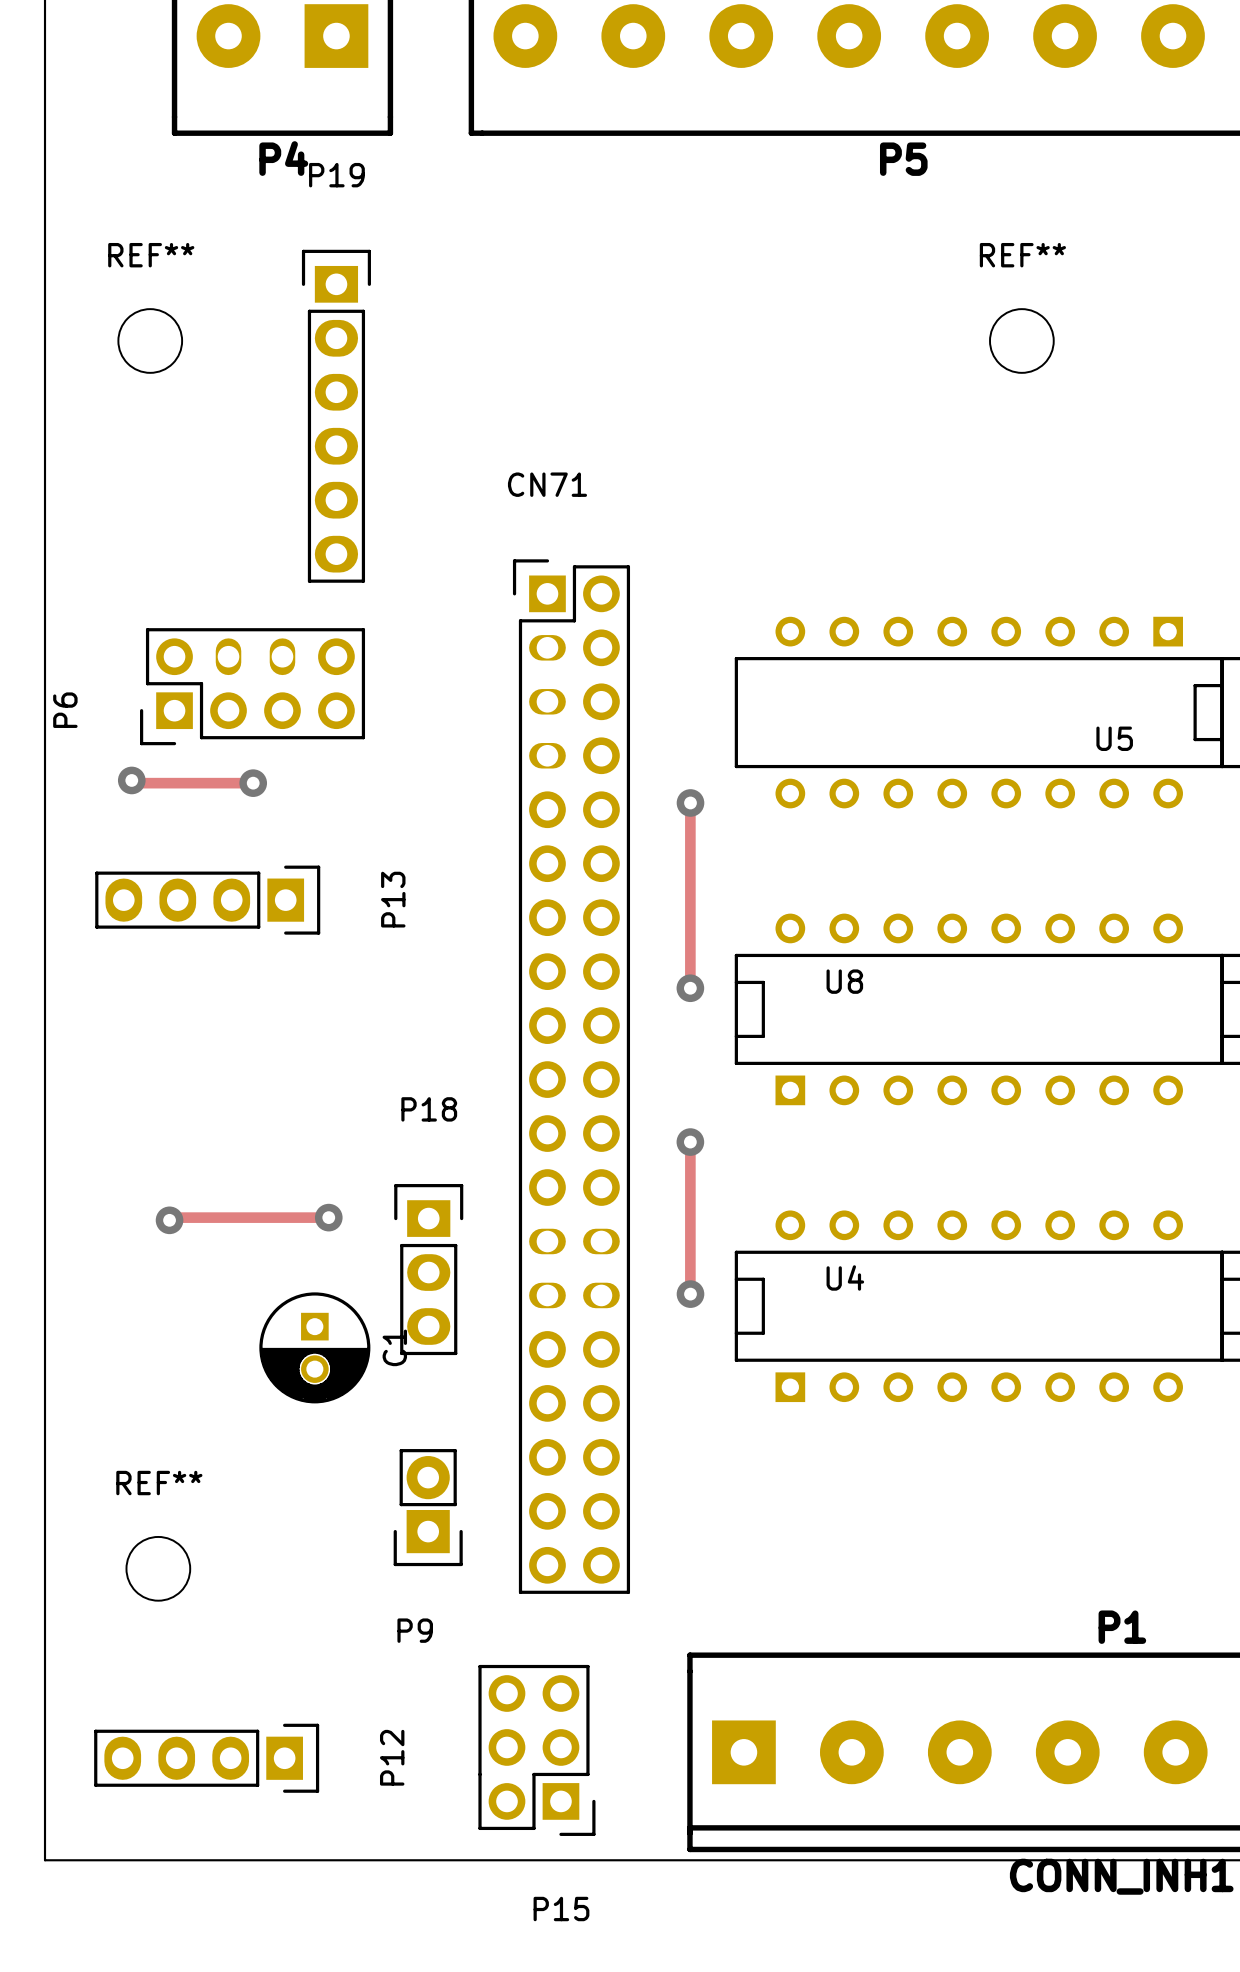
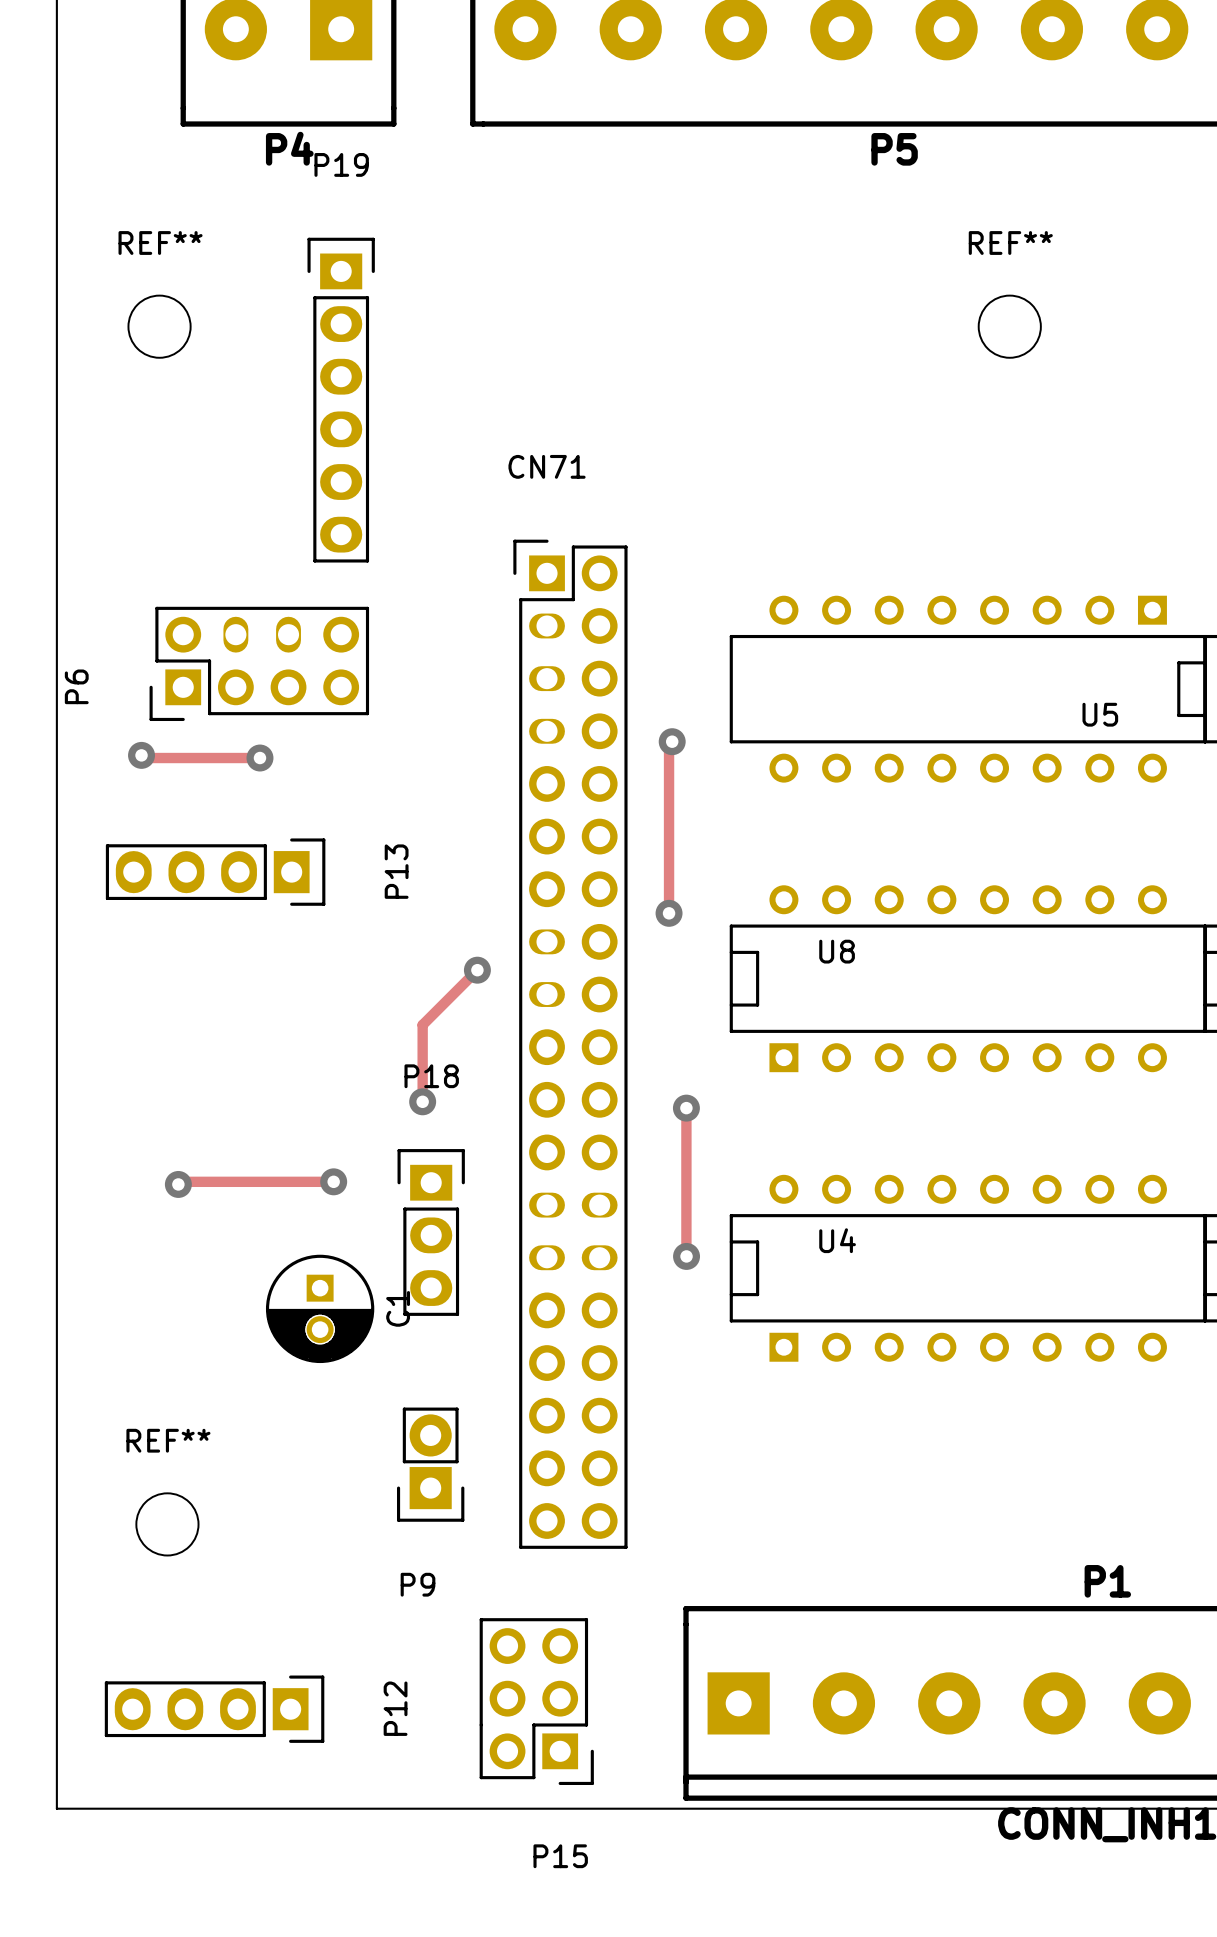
CN71 footprint: [512, 559, 631, 1594] -> [513, 539, 628, 1549]
track: none -> (672, 741) (669, 744) (669, 913)
via position: (690, 802) -> (672, 741)
track: (690, 803) (690, 988) -> none
via position: (690, 988) -> (669, 913)
track: none -> (477, 970) (422, 1024) (422, 1101)
via: none -> (477, 970)
via: none -> (422, 1101)

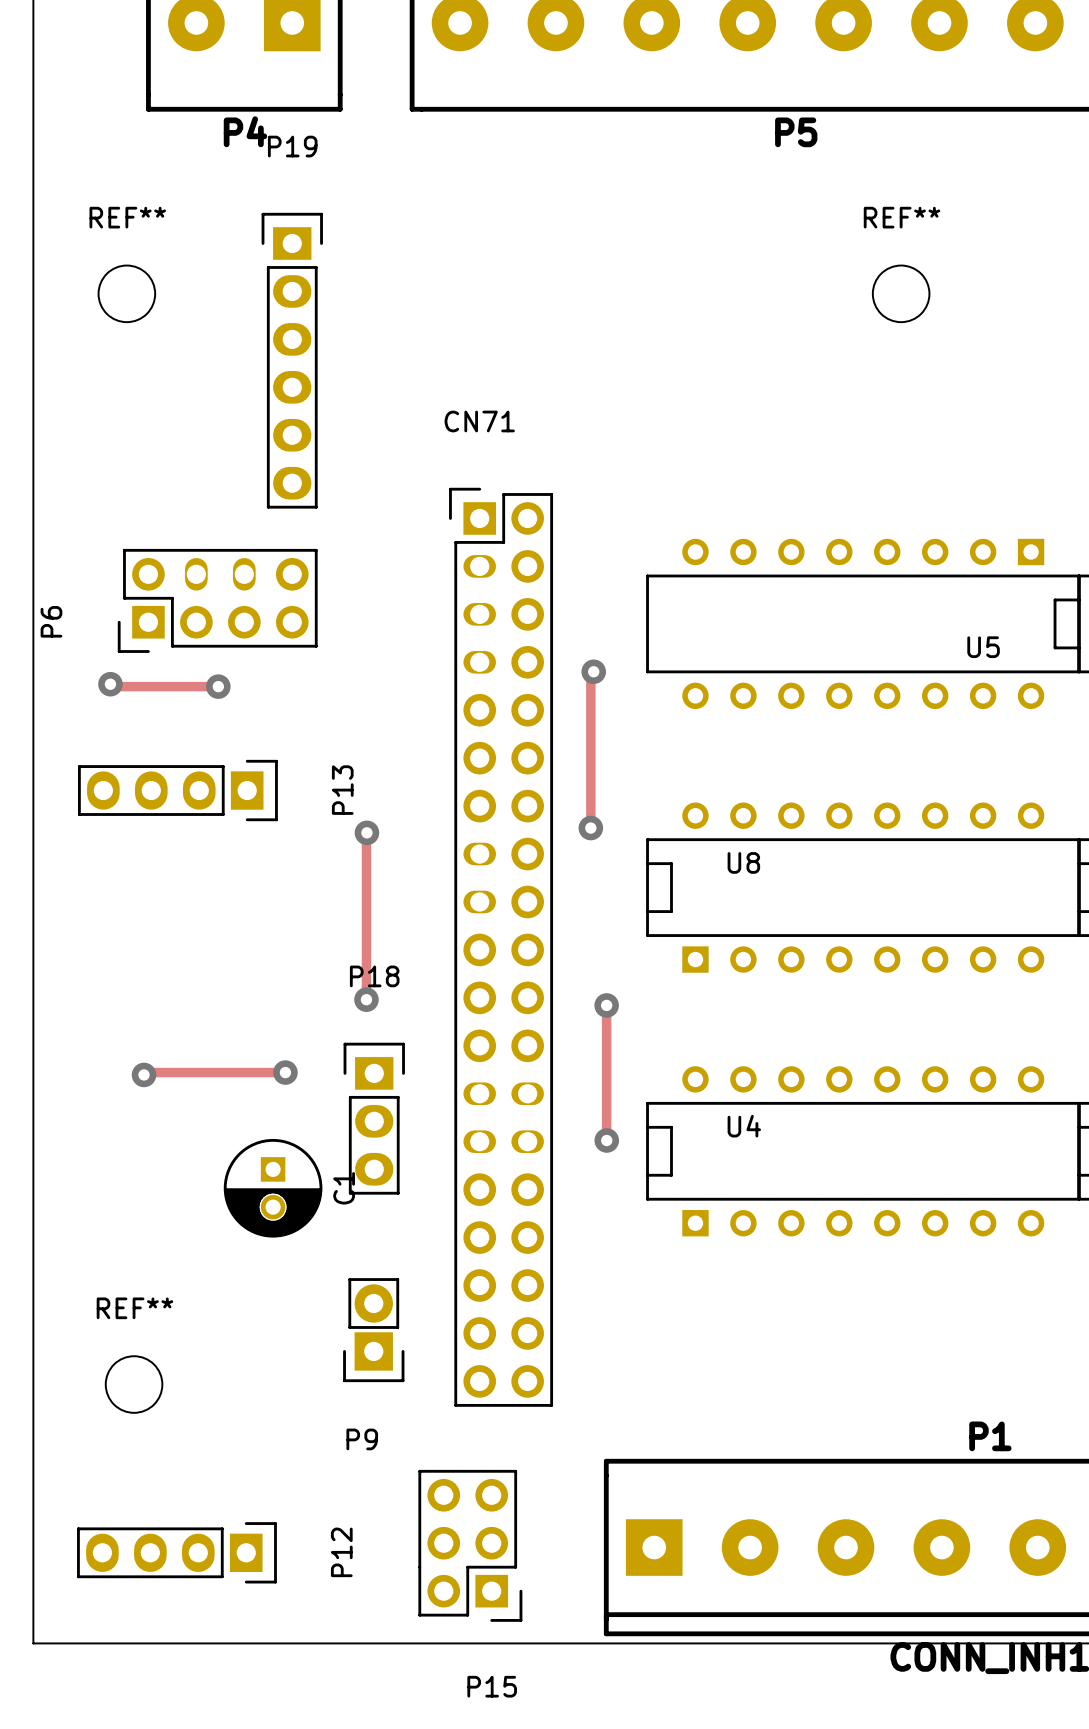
track: (477, 970) (422, 1024) -> (366, 832) (366, 929)
via position: (477, 970) -> (366, 832)

